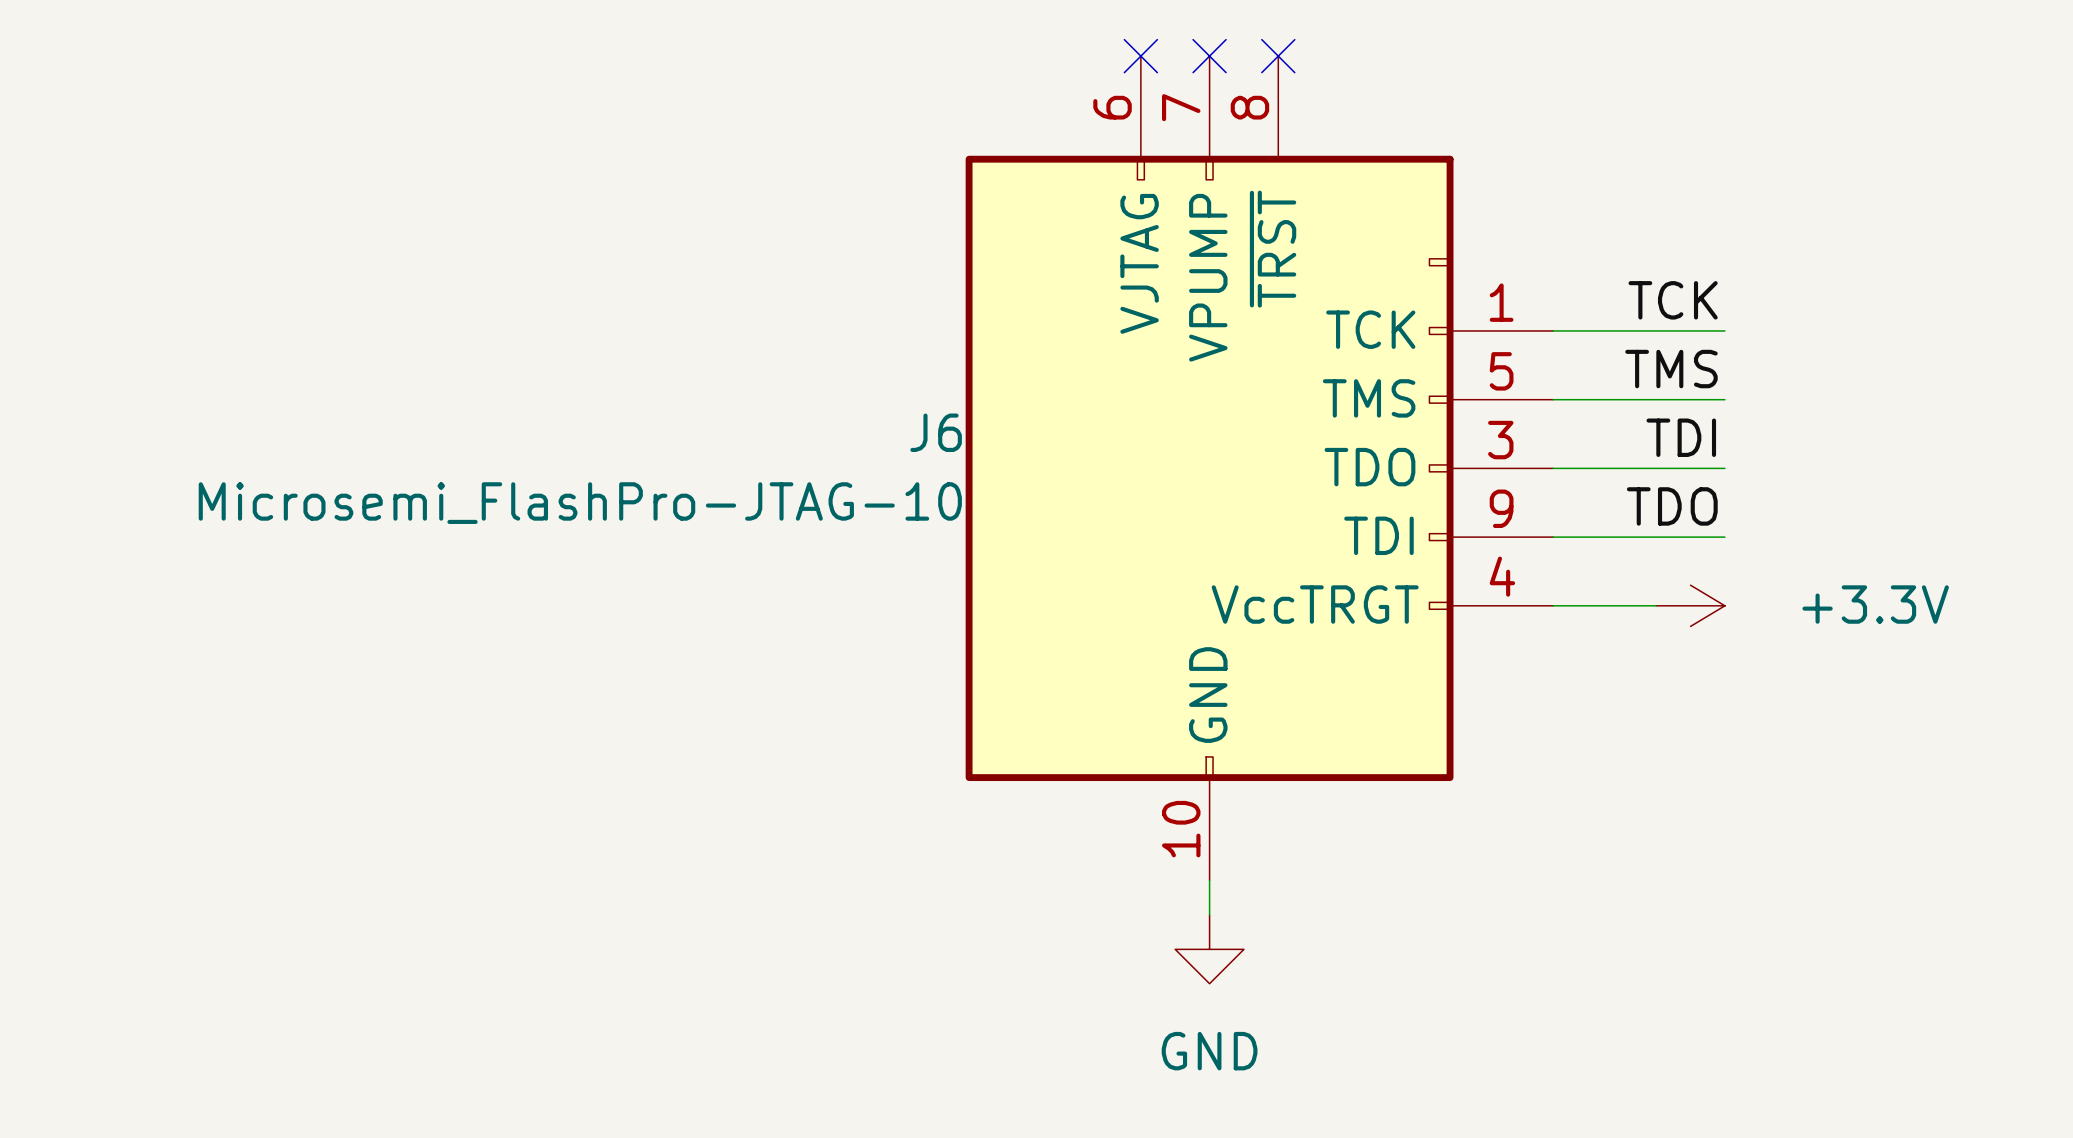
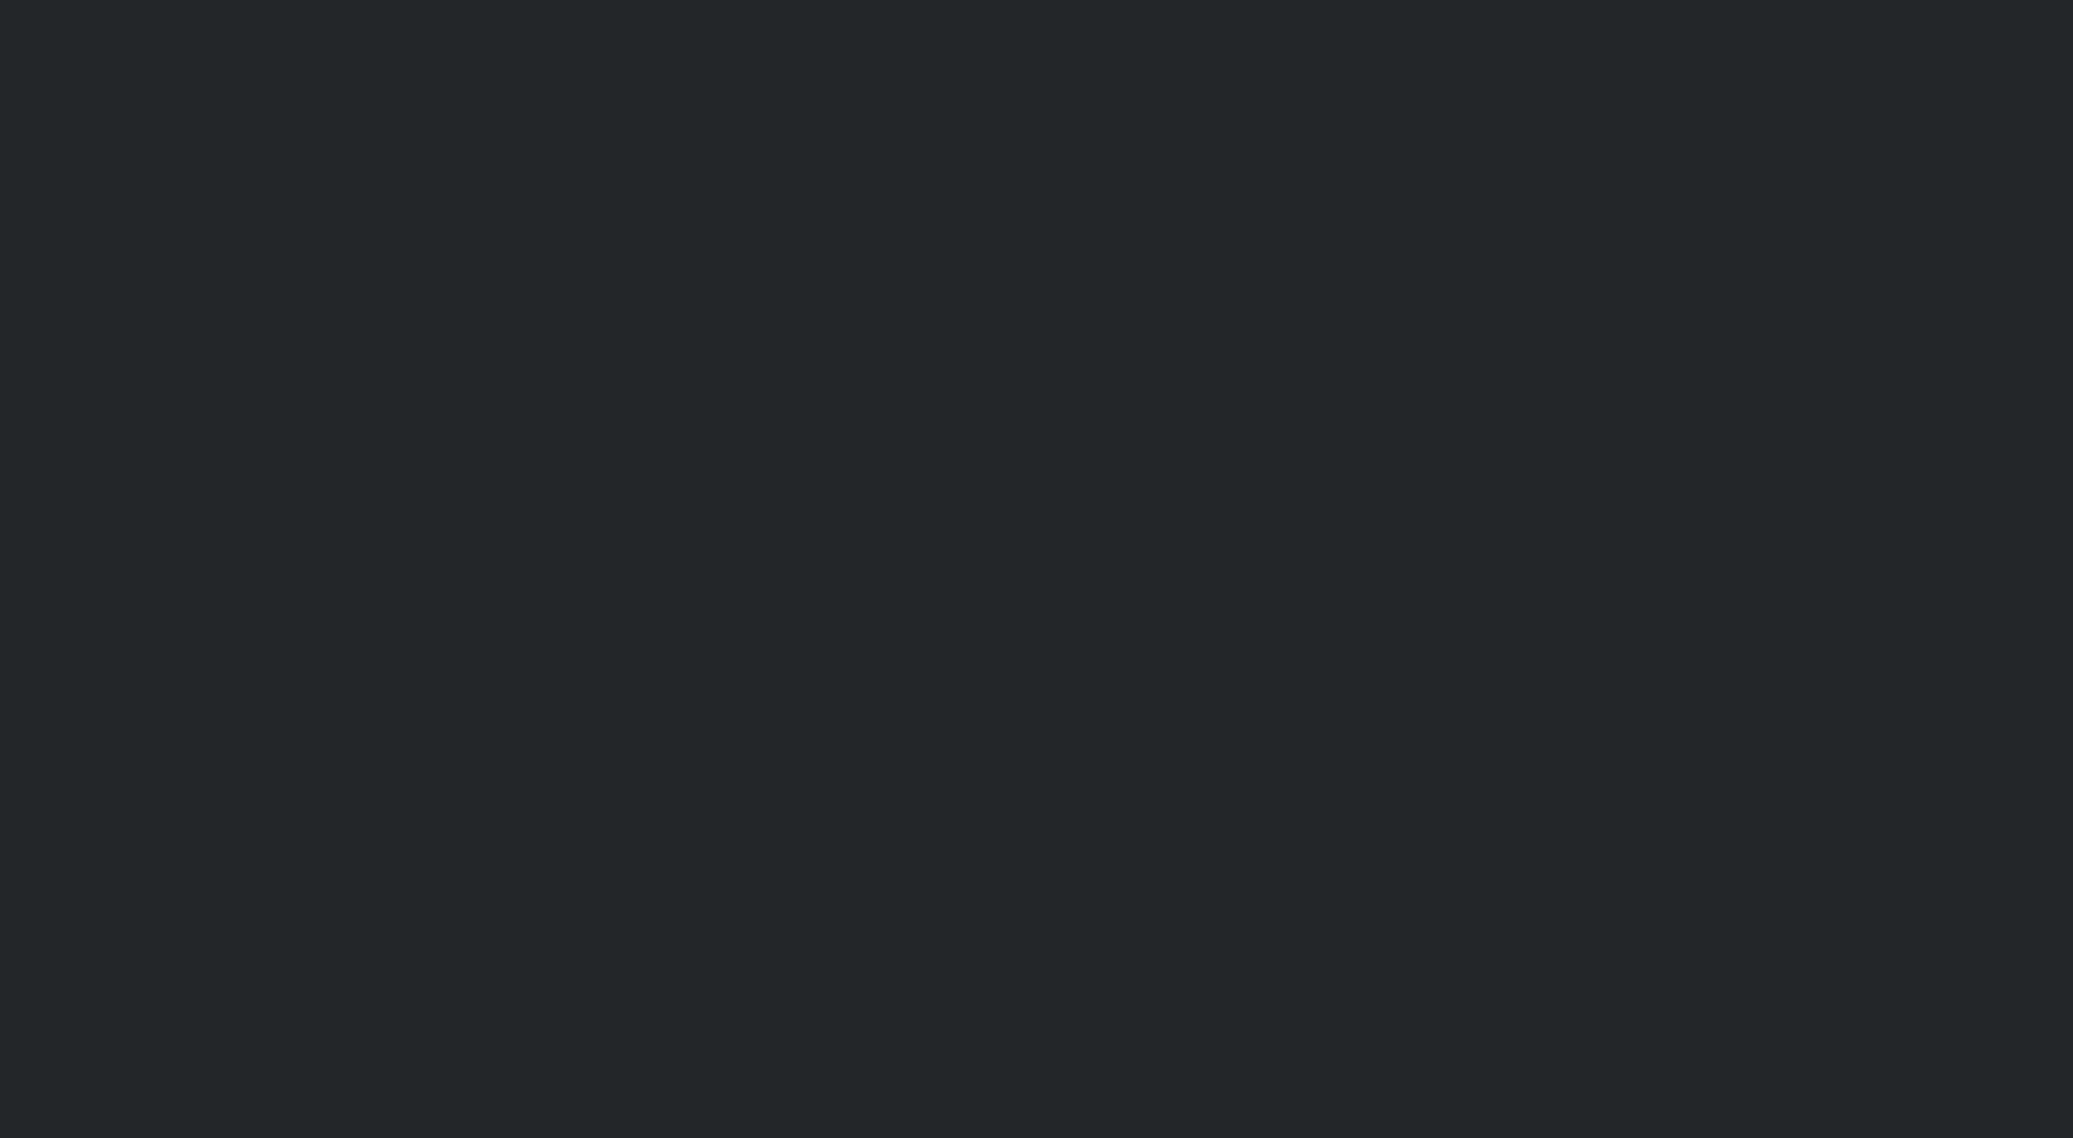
no-connect mark: (1140, 56) -> none
no-connect mark: (1209, 56) -> none
no-connect mark: (1278, 56) -> none
label: TCK (1673, 300) -> none
wire: (1553, 330) (1724, 330) -> none
label: TMS (1671, 369) -> none
wire: (1553, 399) (1724, 399) -> none
label: TDI (1681, 437) -> none
J6: Microsemi_FlashPro-JTAG-10 (1259, 468) -> none
wire: (1553, 468) (1724, 468) -> none
label: TDO (1672, 506) -> none
wire: (1553, 537) (1724, 537) -> none
wire: (1553, 605) (1656, 605) -> none
power symbol: +3.3V (1690, 605) -> none
wire: (1209, 880) (1209, 915) -> none
power symbol: GND (1209, 949) -> none

